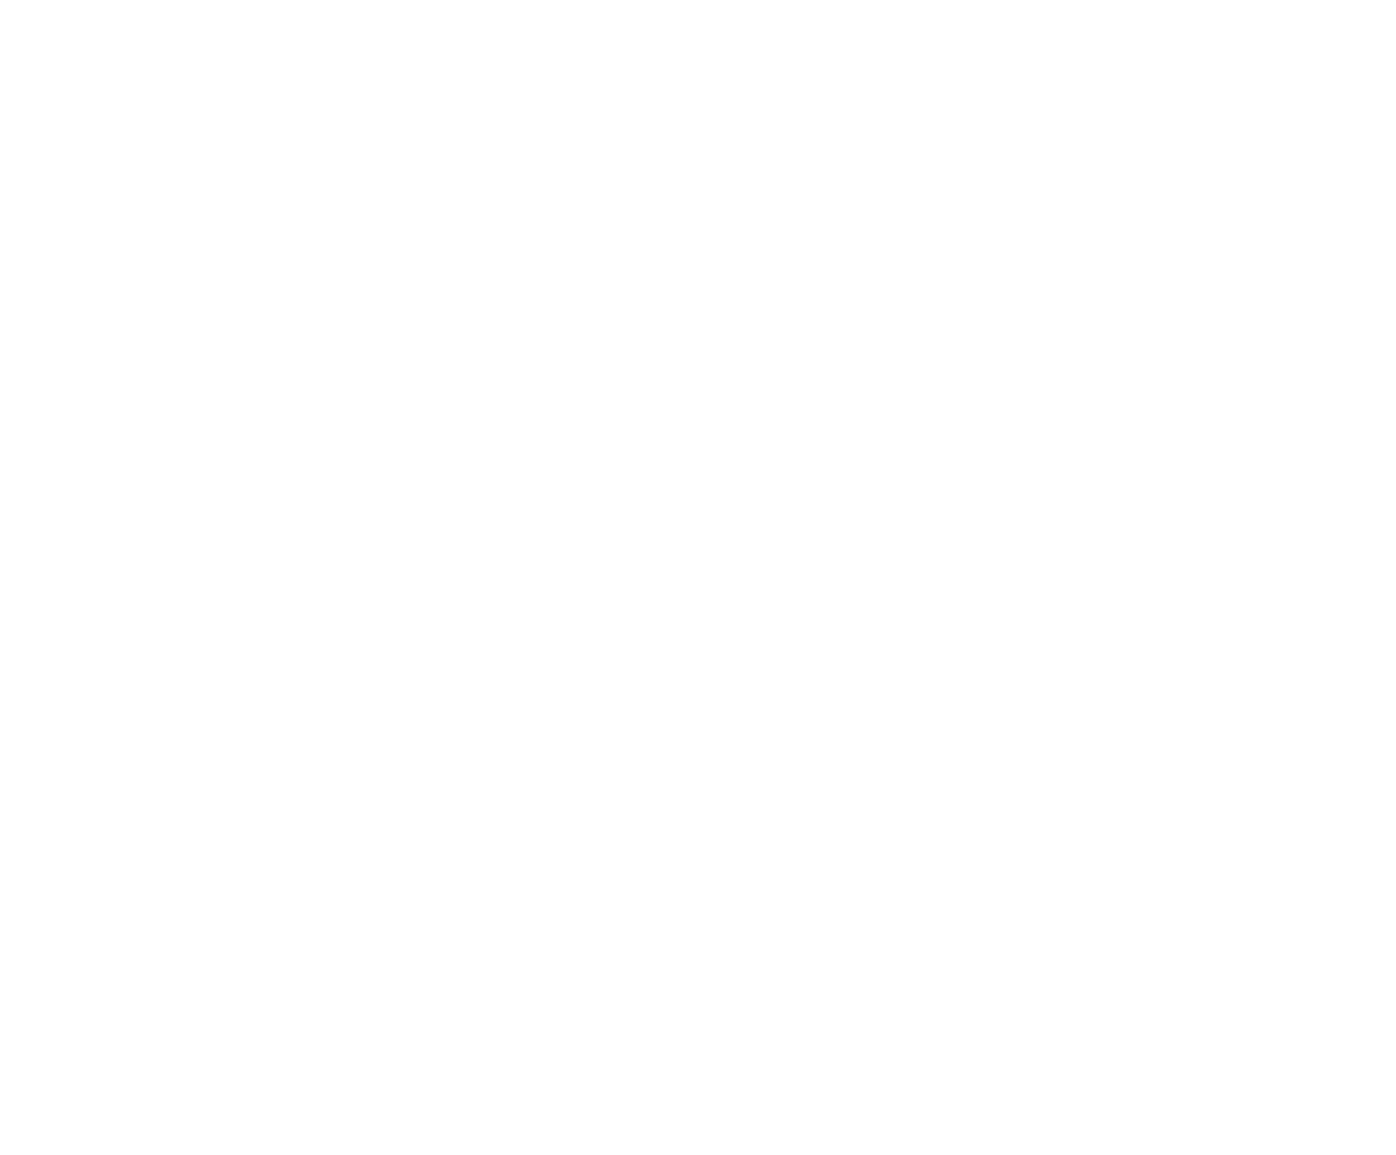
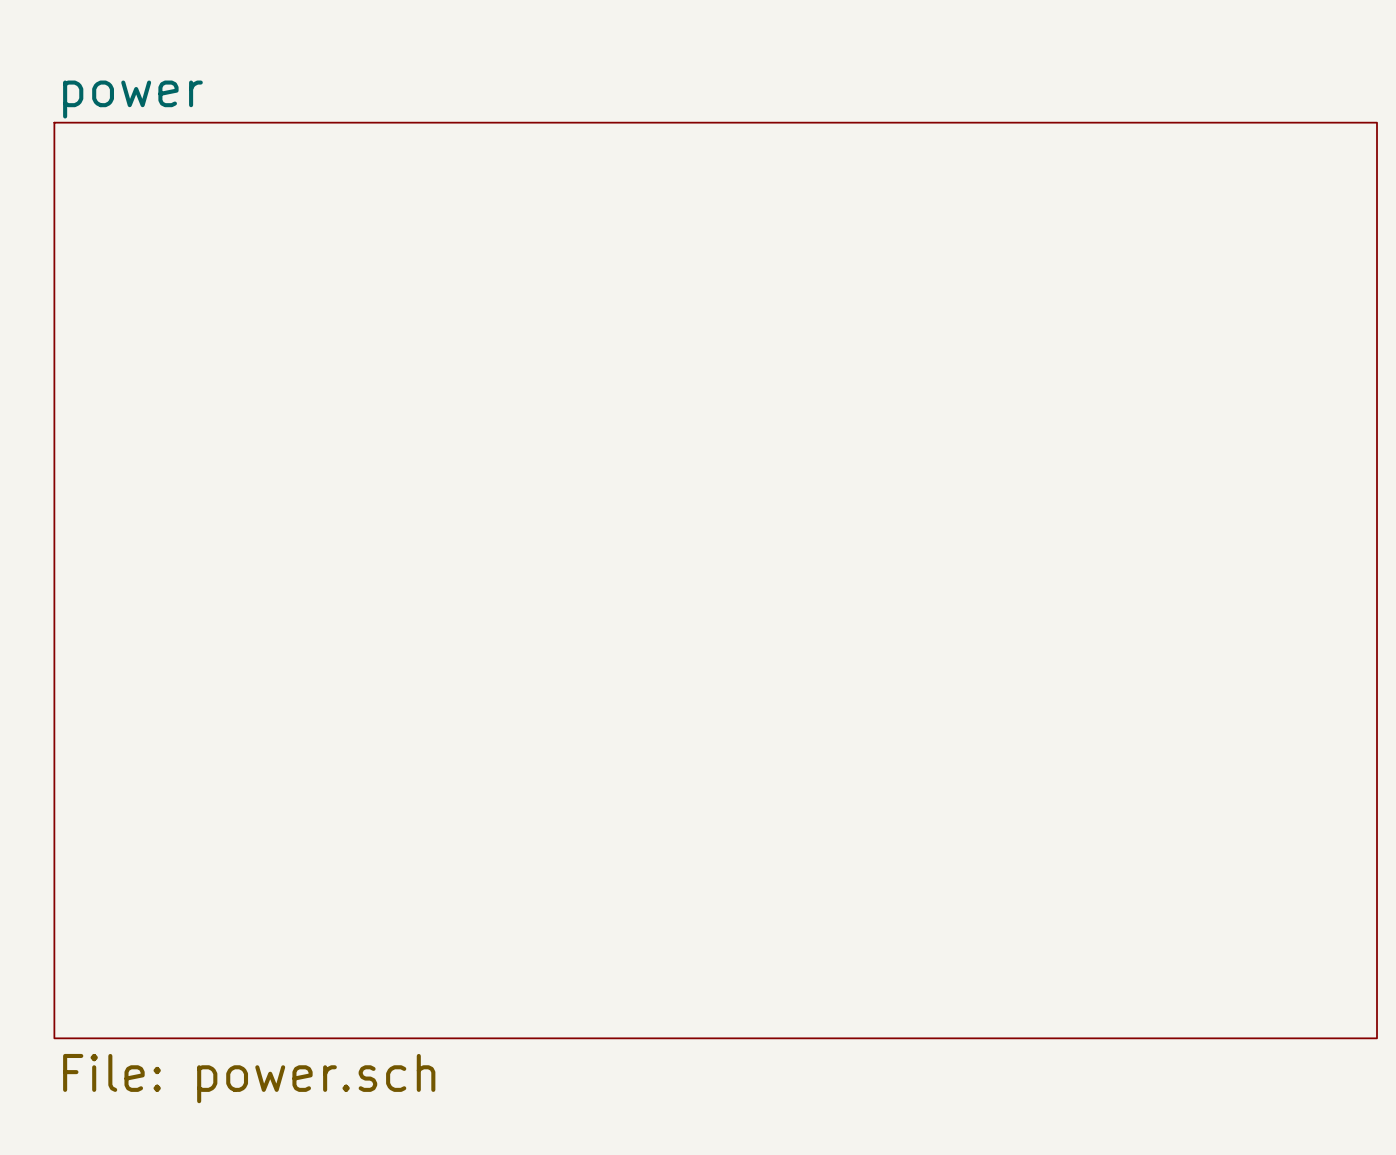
sheet power: none -> File: power.sch (715, 580)

